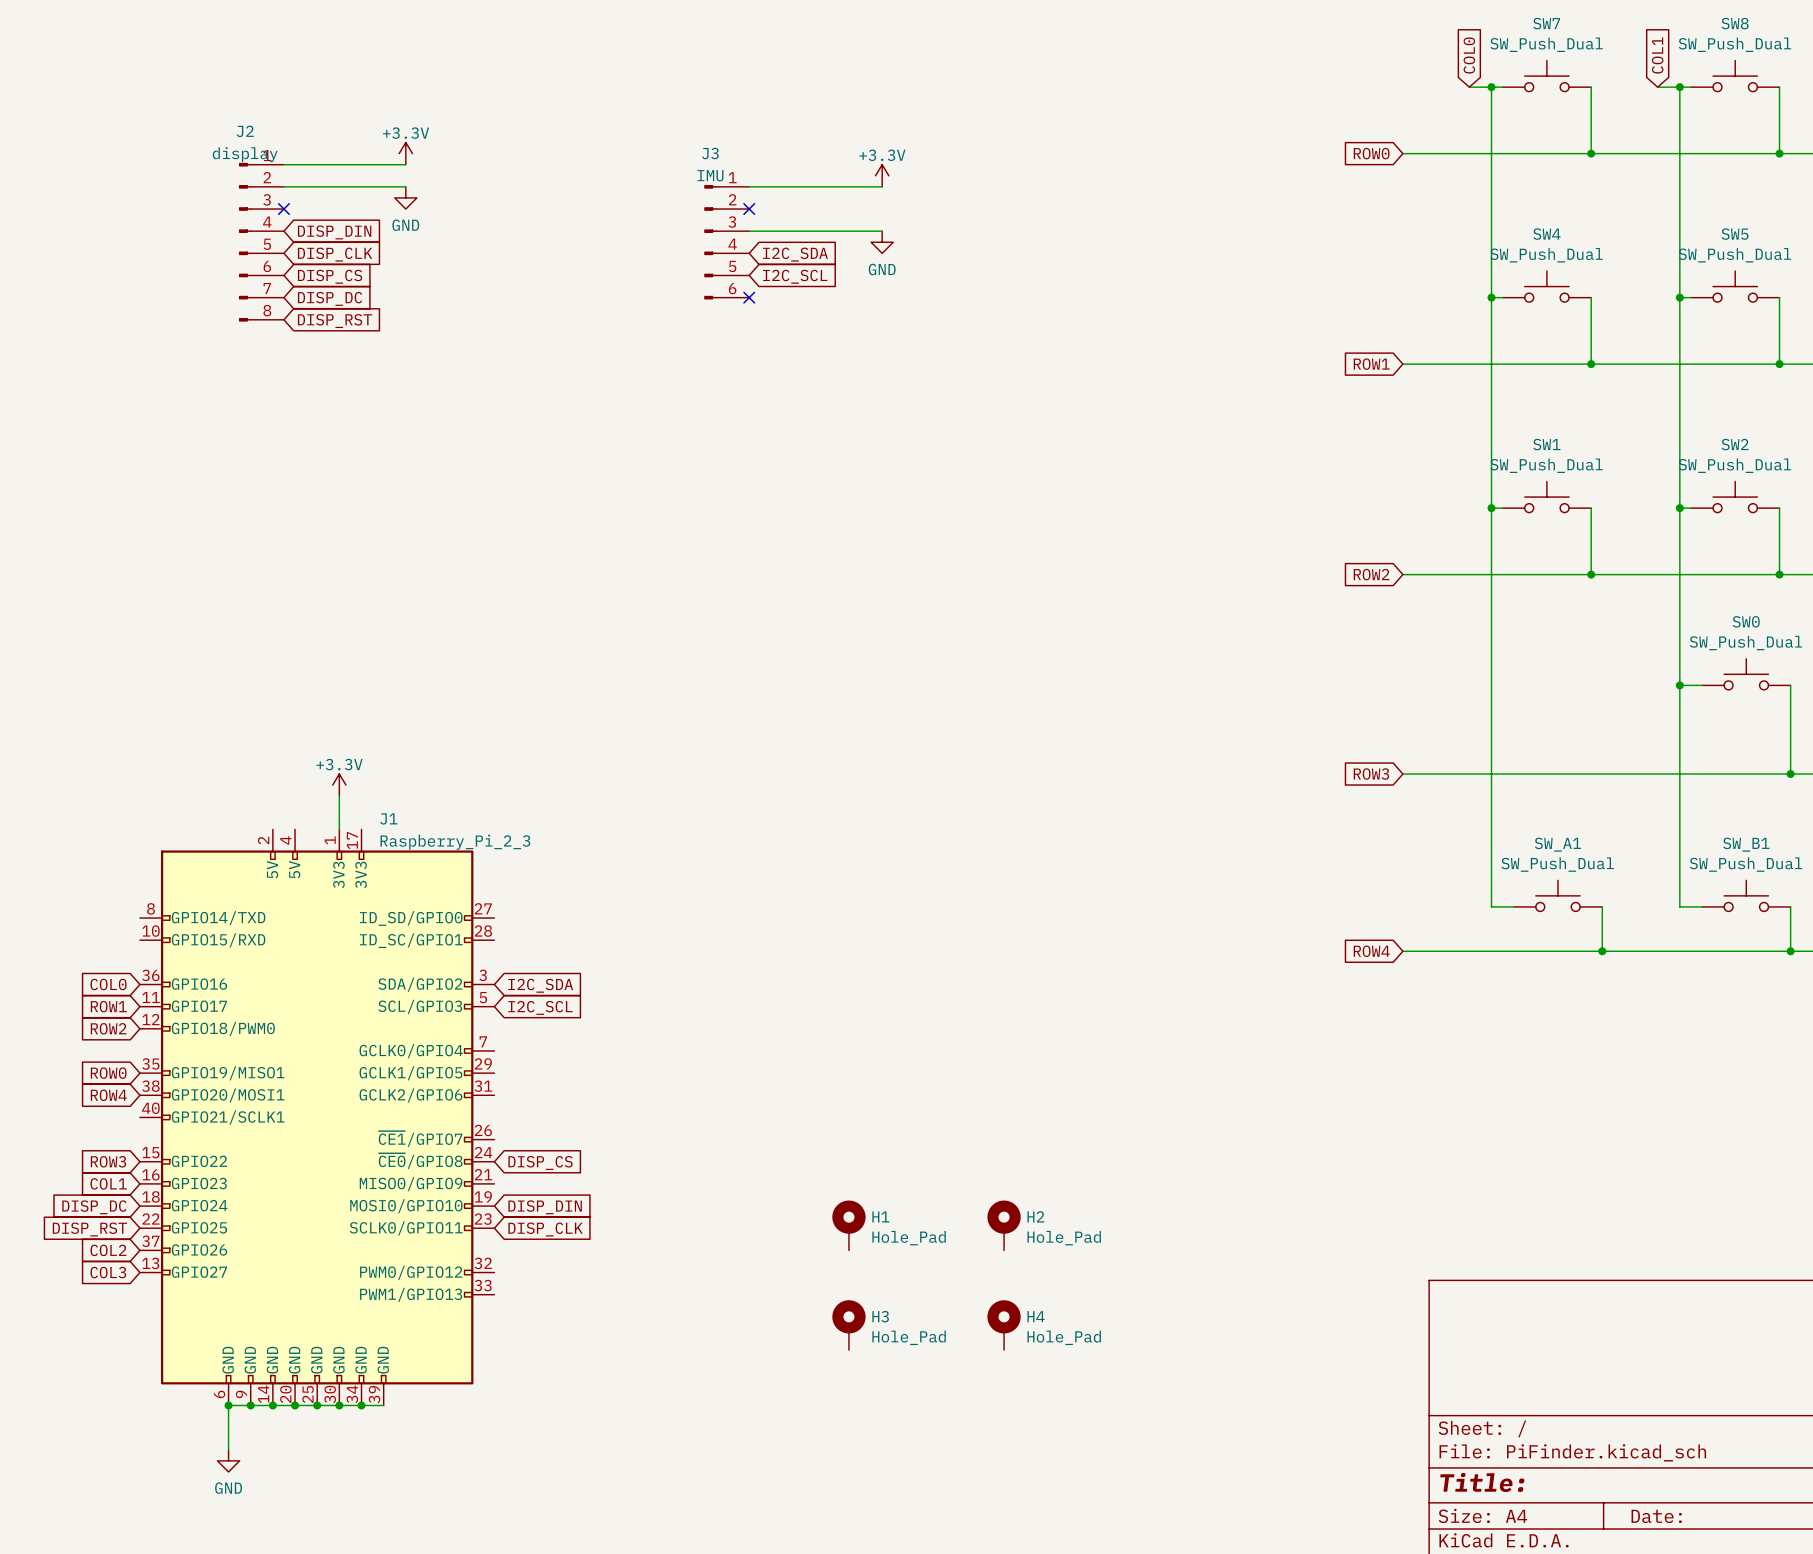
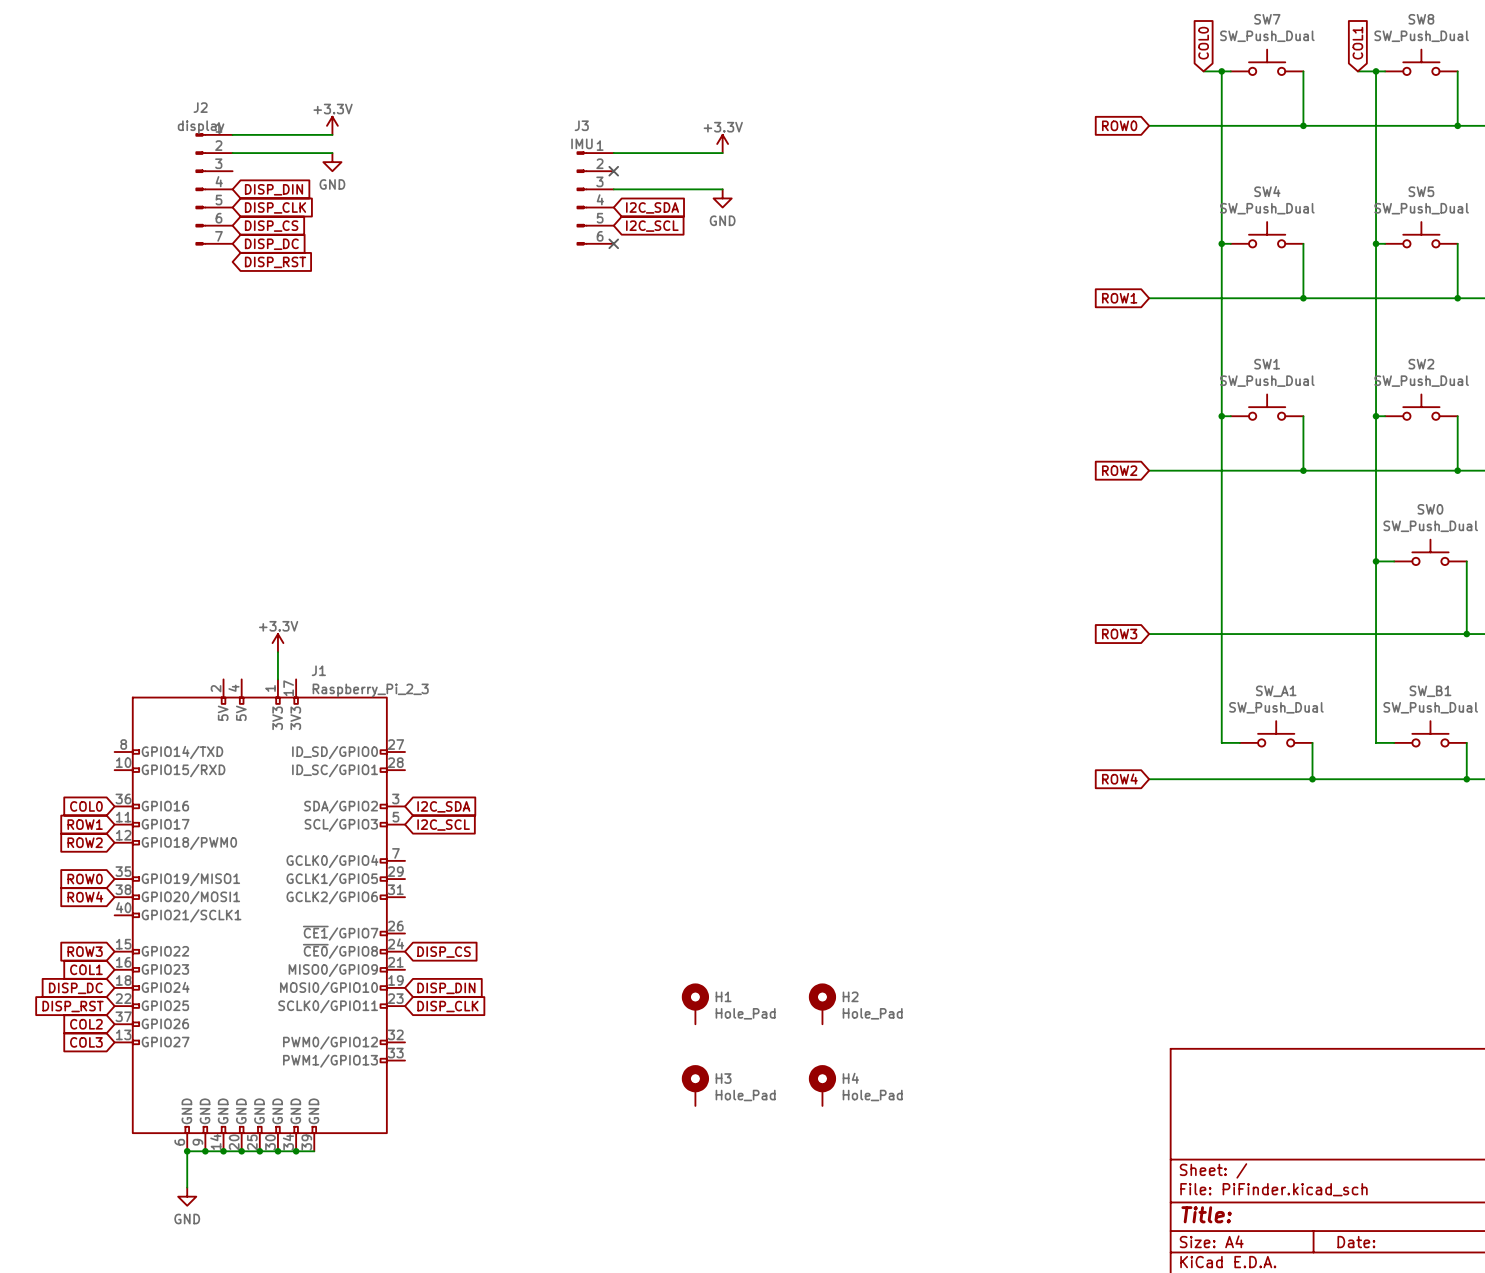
J2 symbol: [238, 162, 284, 322] -> [195, 133, 233, 246]
no-connect mark: (283, 209) -> none

